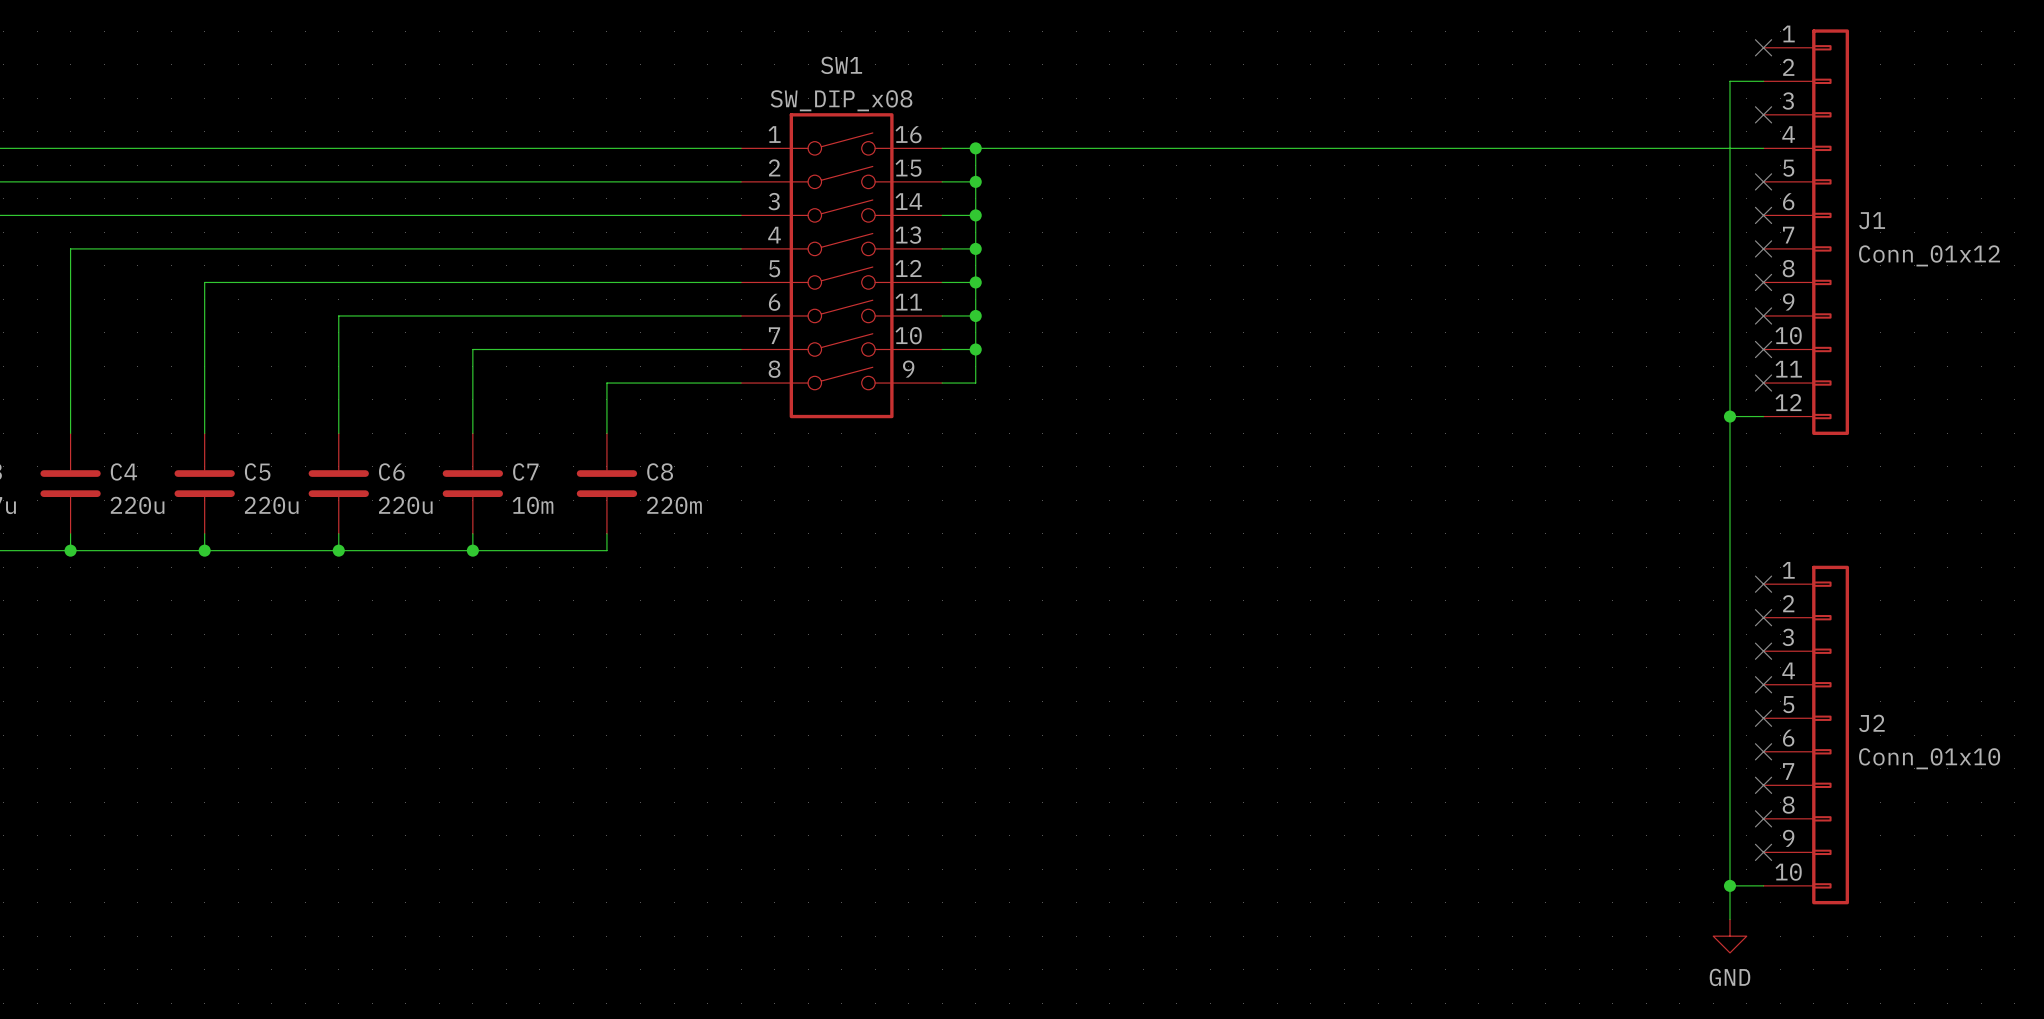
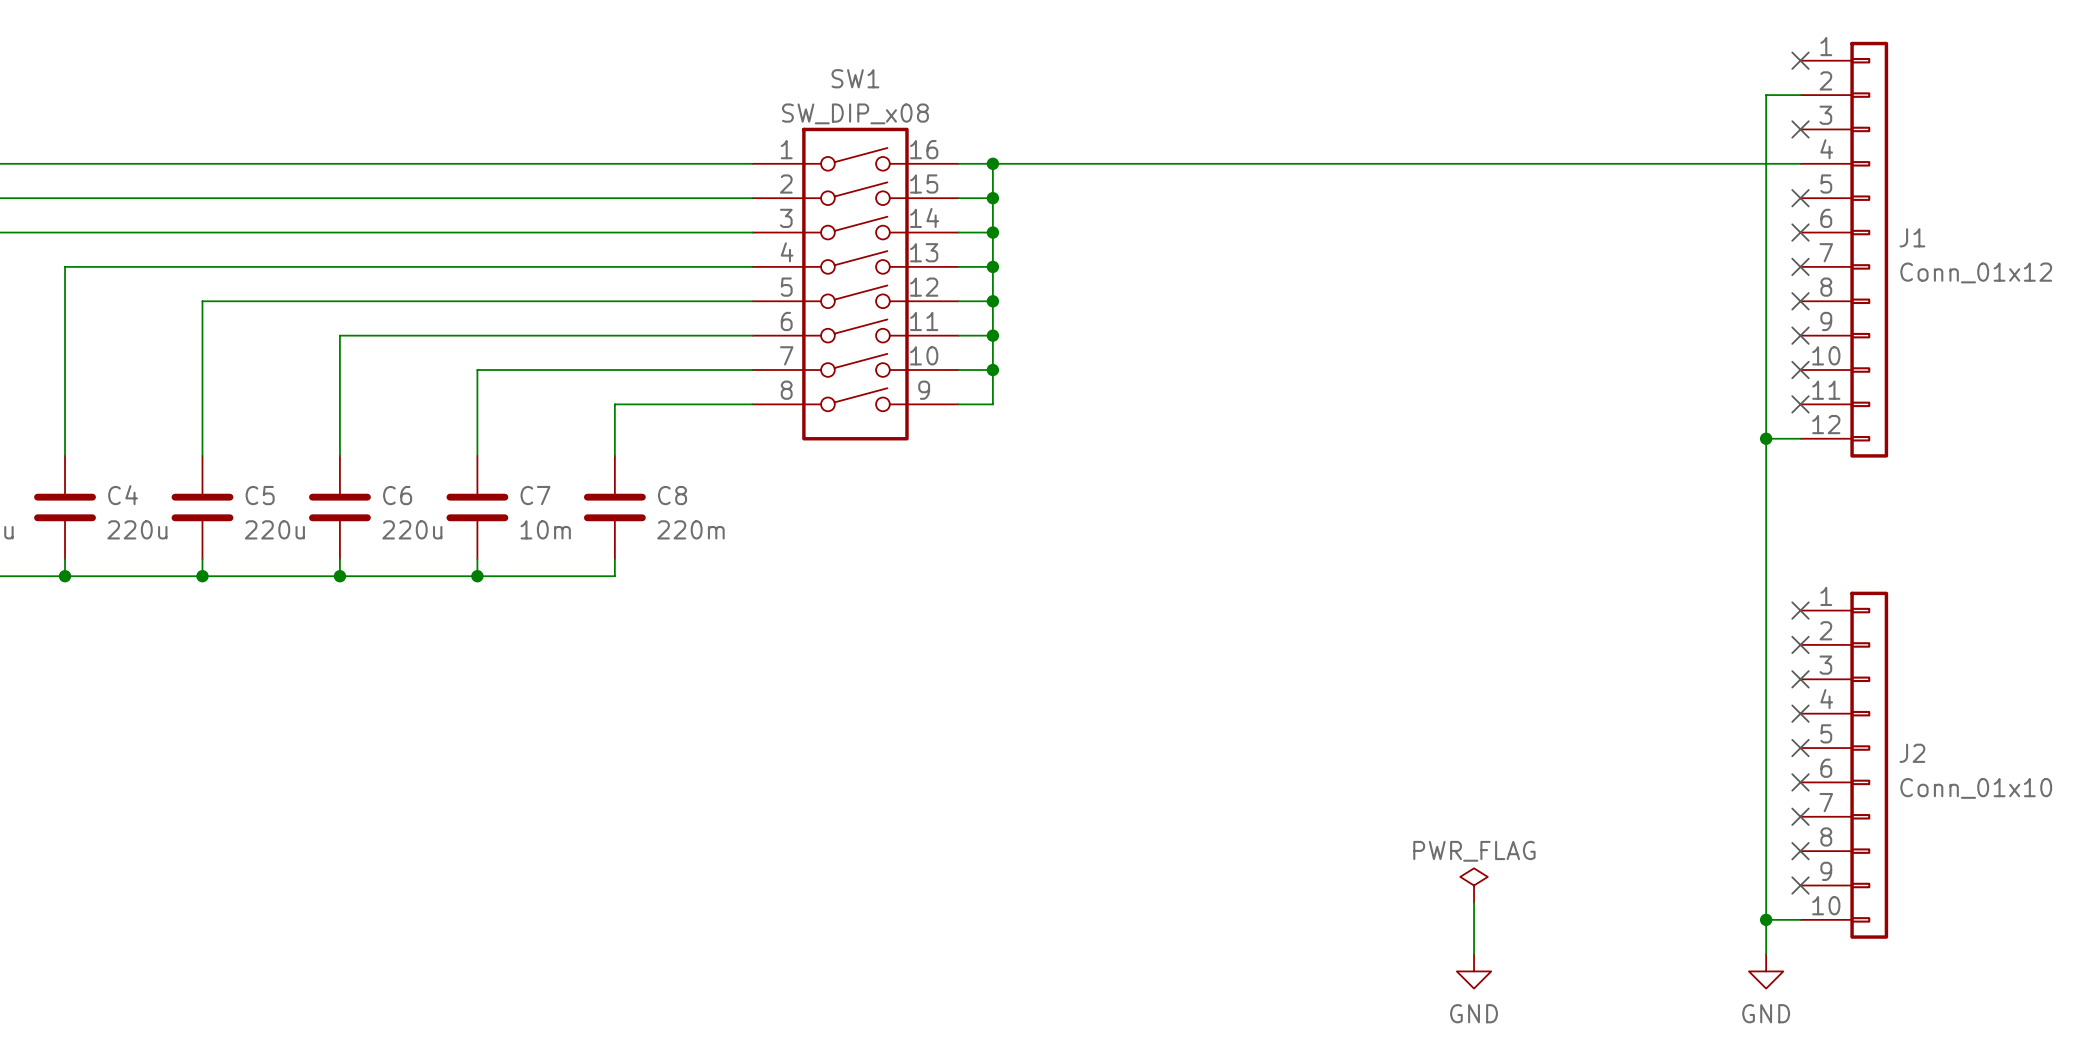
power symbol: none -> PWR_FLAG (1474, 885)
wire: none -> (1474, 902) (1474, 954)
power symbol: none -> GND (1474, 971)

